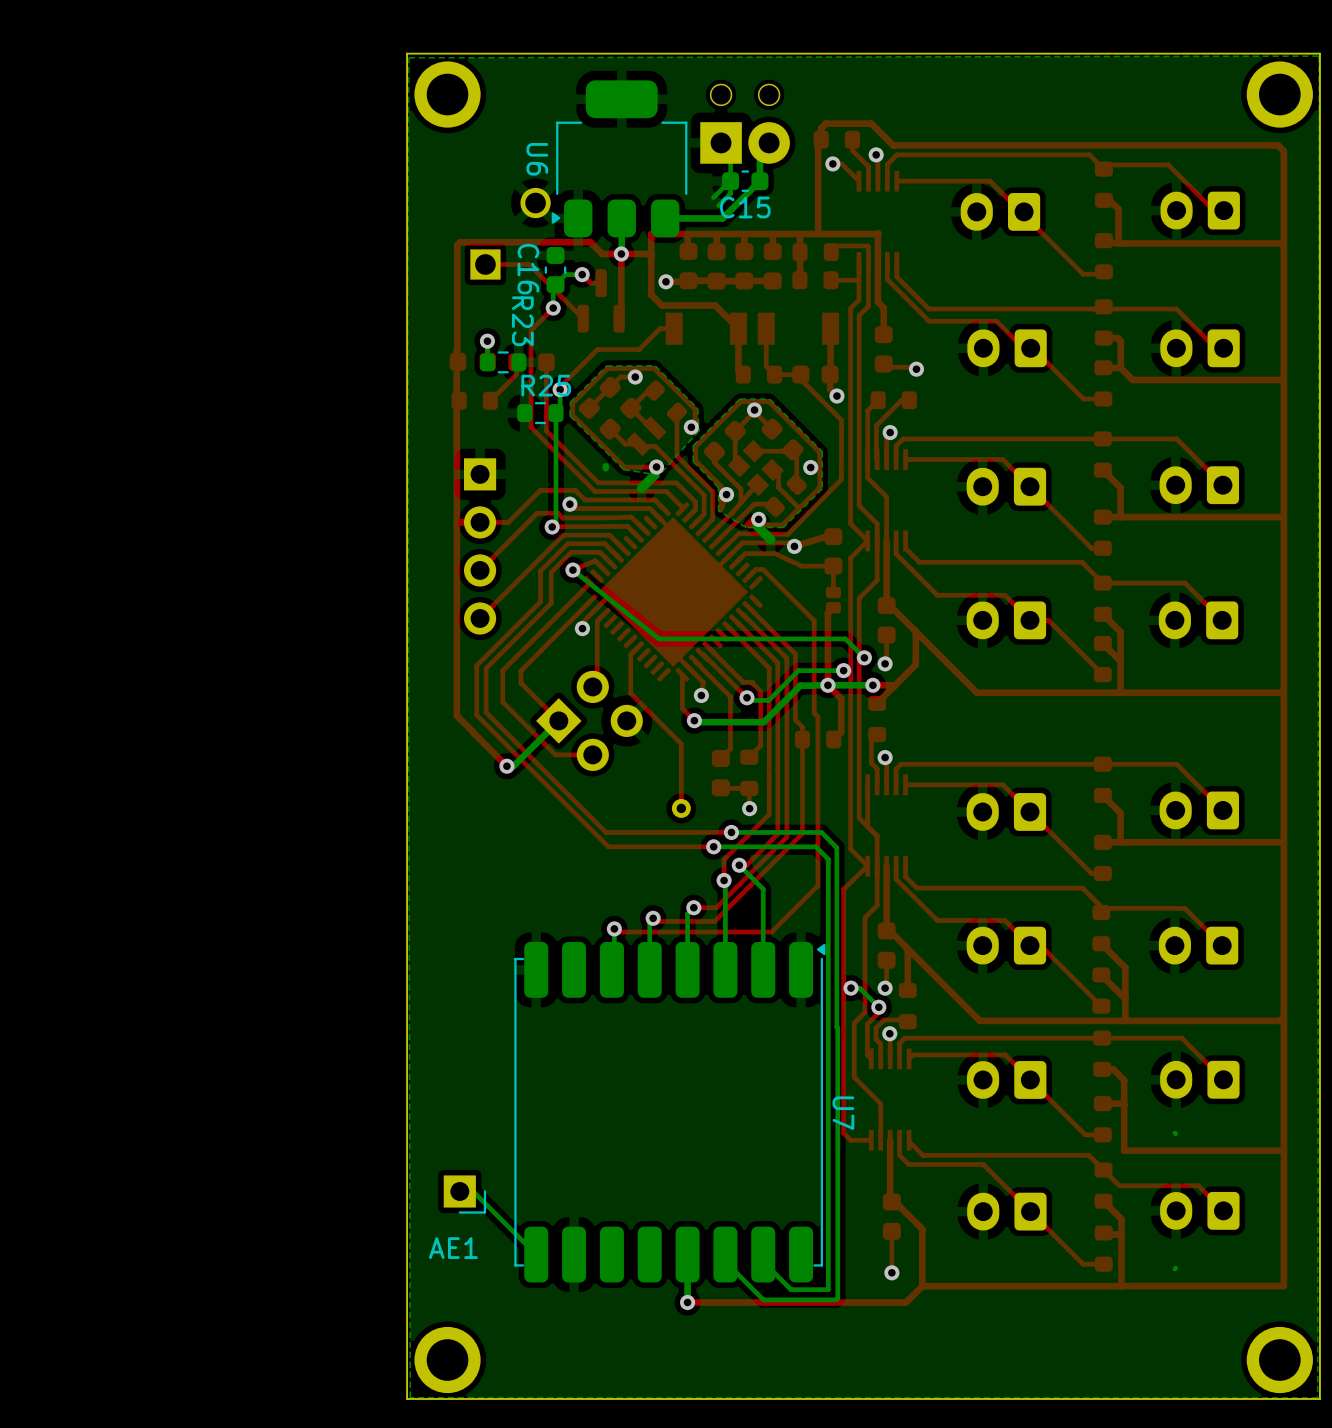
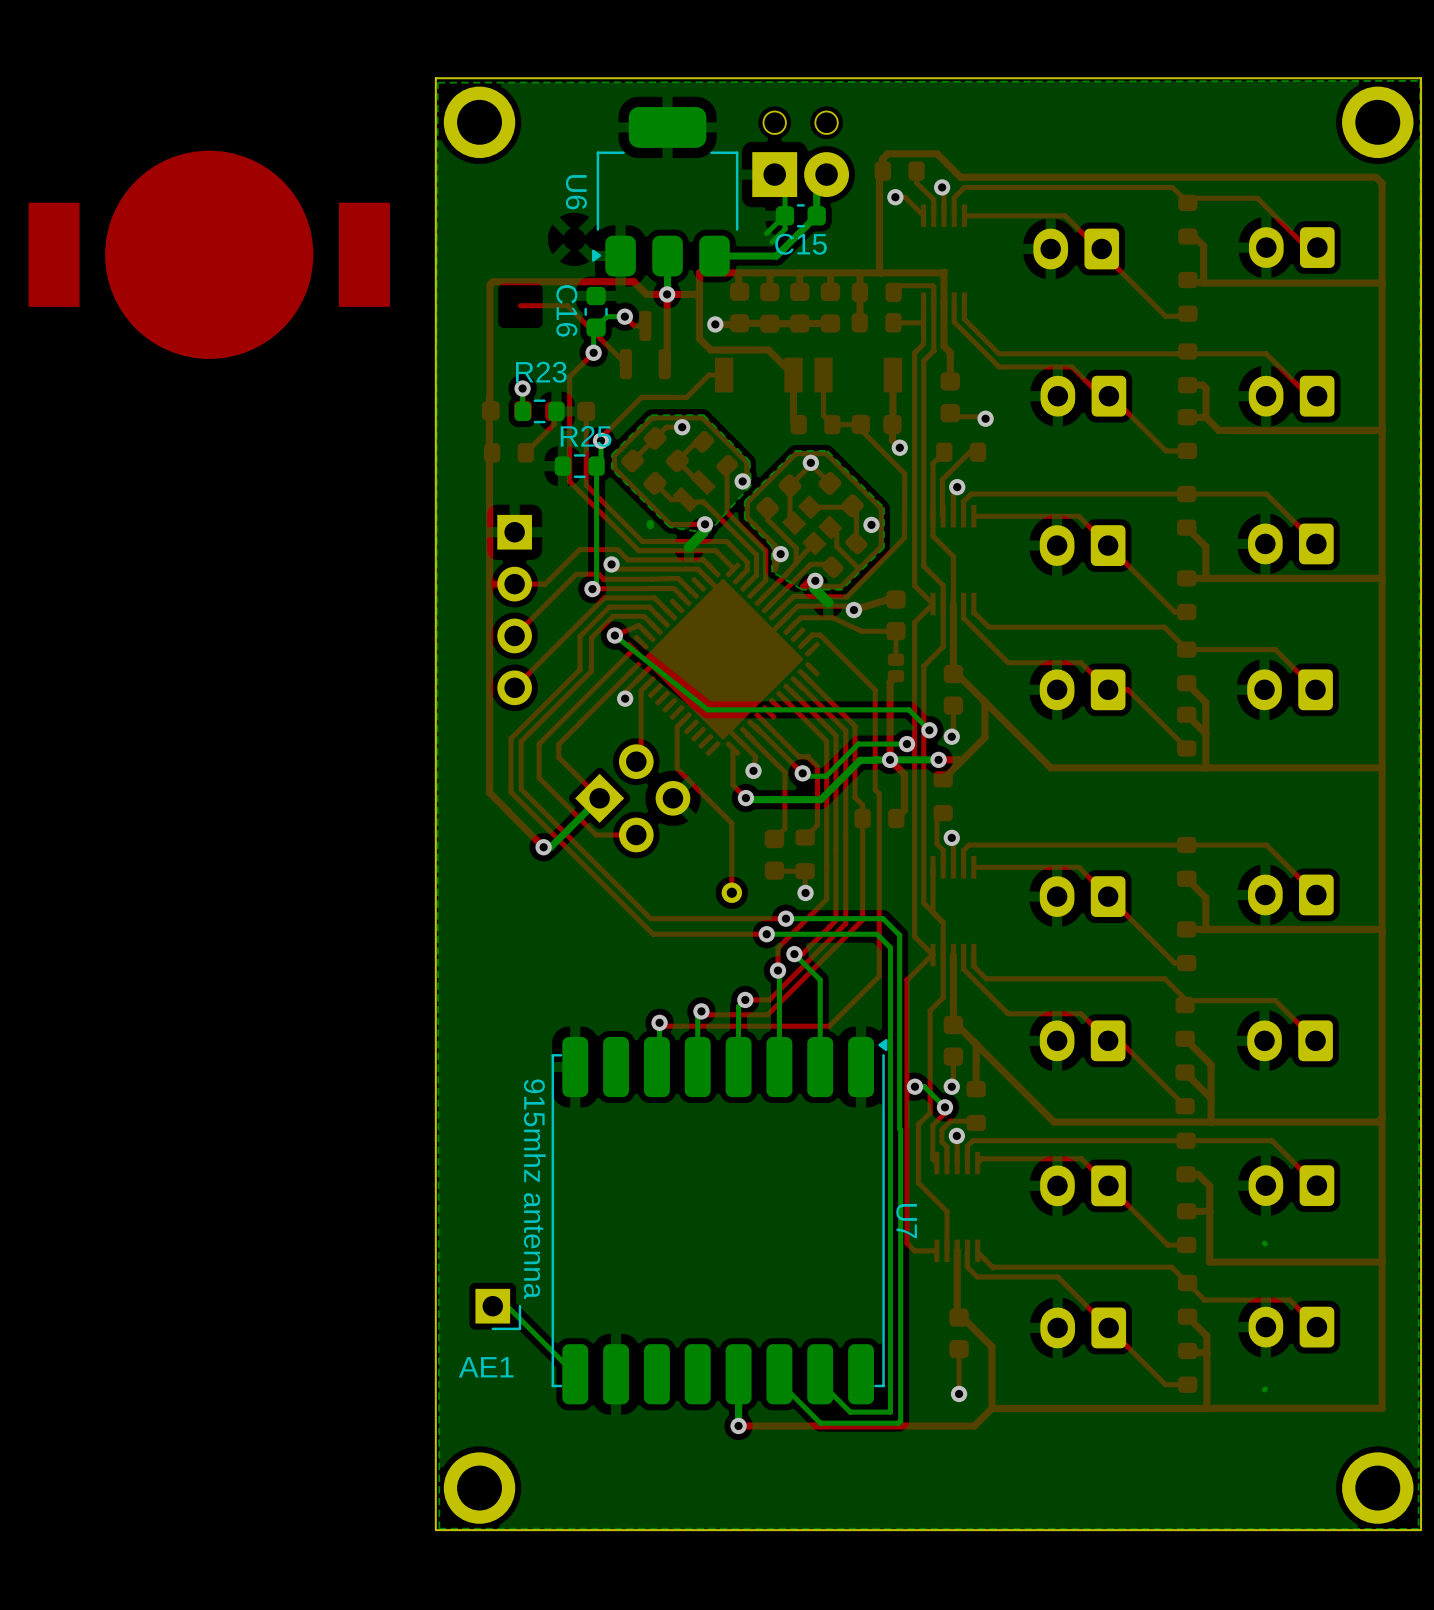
part: none -> (209, 254)
part: (510, 233) -> none
R23 name rotation: 0° (522, 321) -> 90° counterclockwise (541, 372)
AE1 value: none -> 915mhz antenna (534, 1189)

